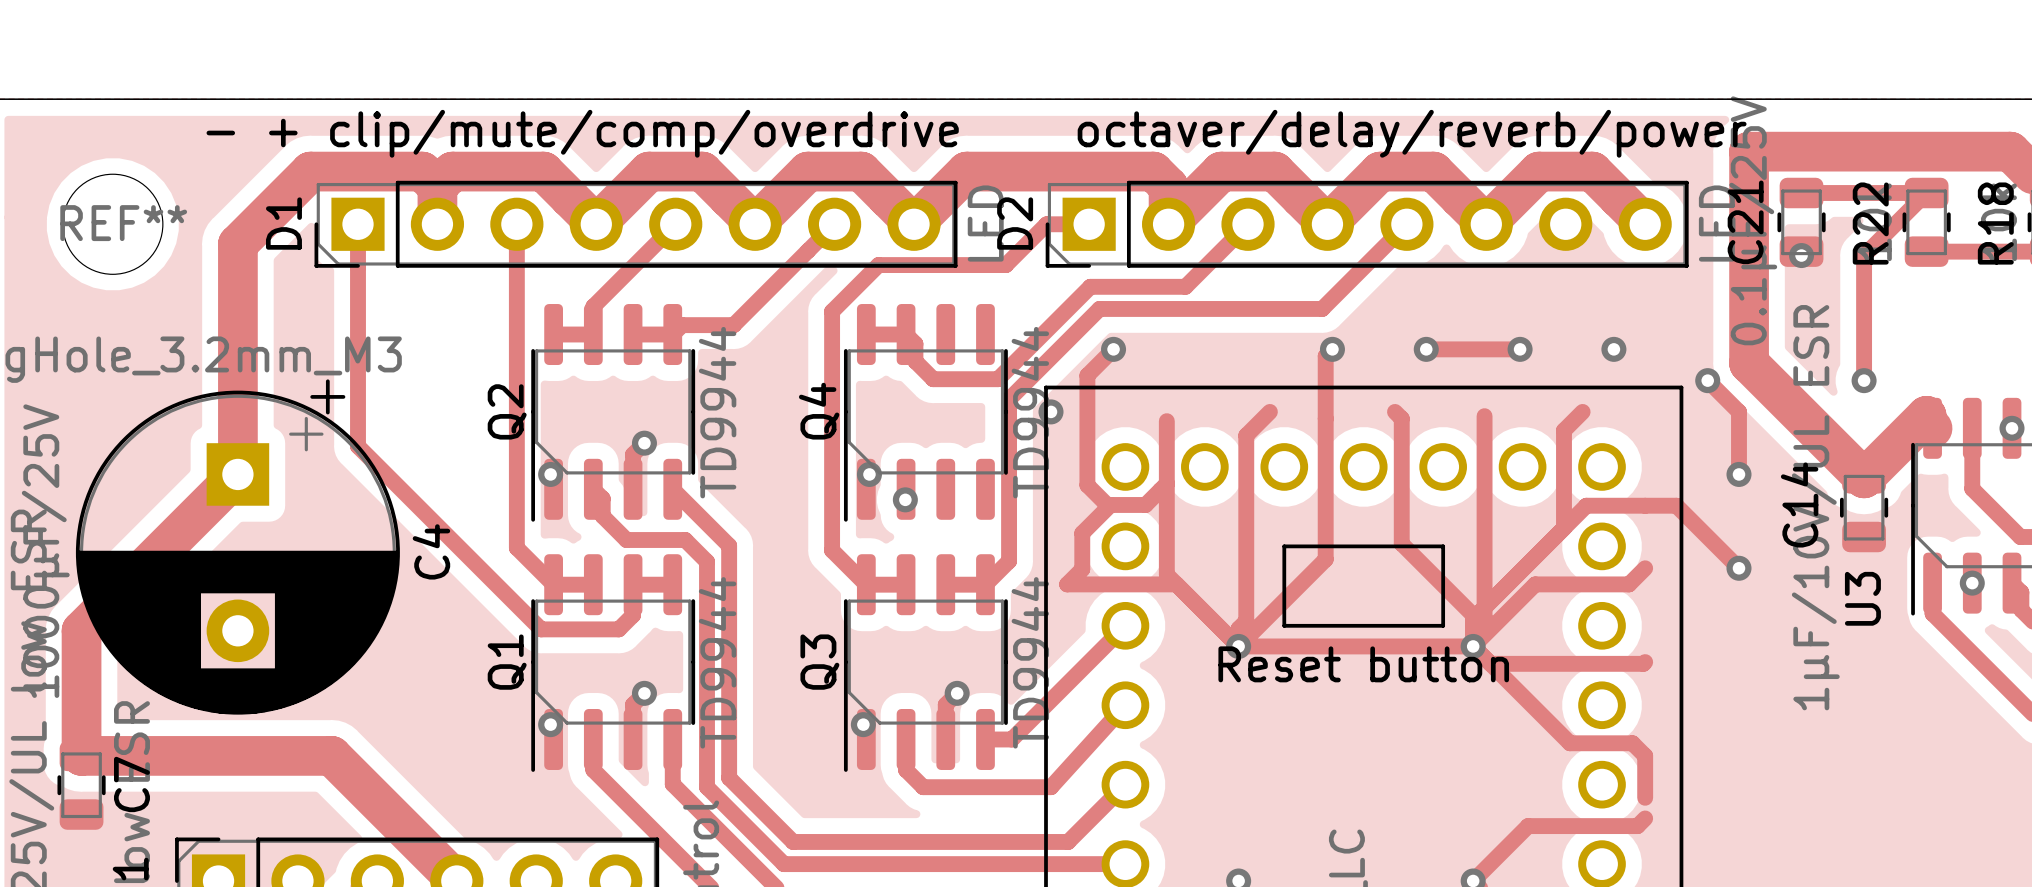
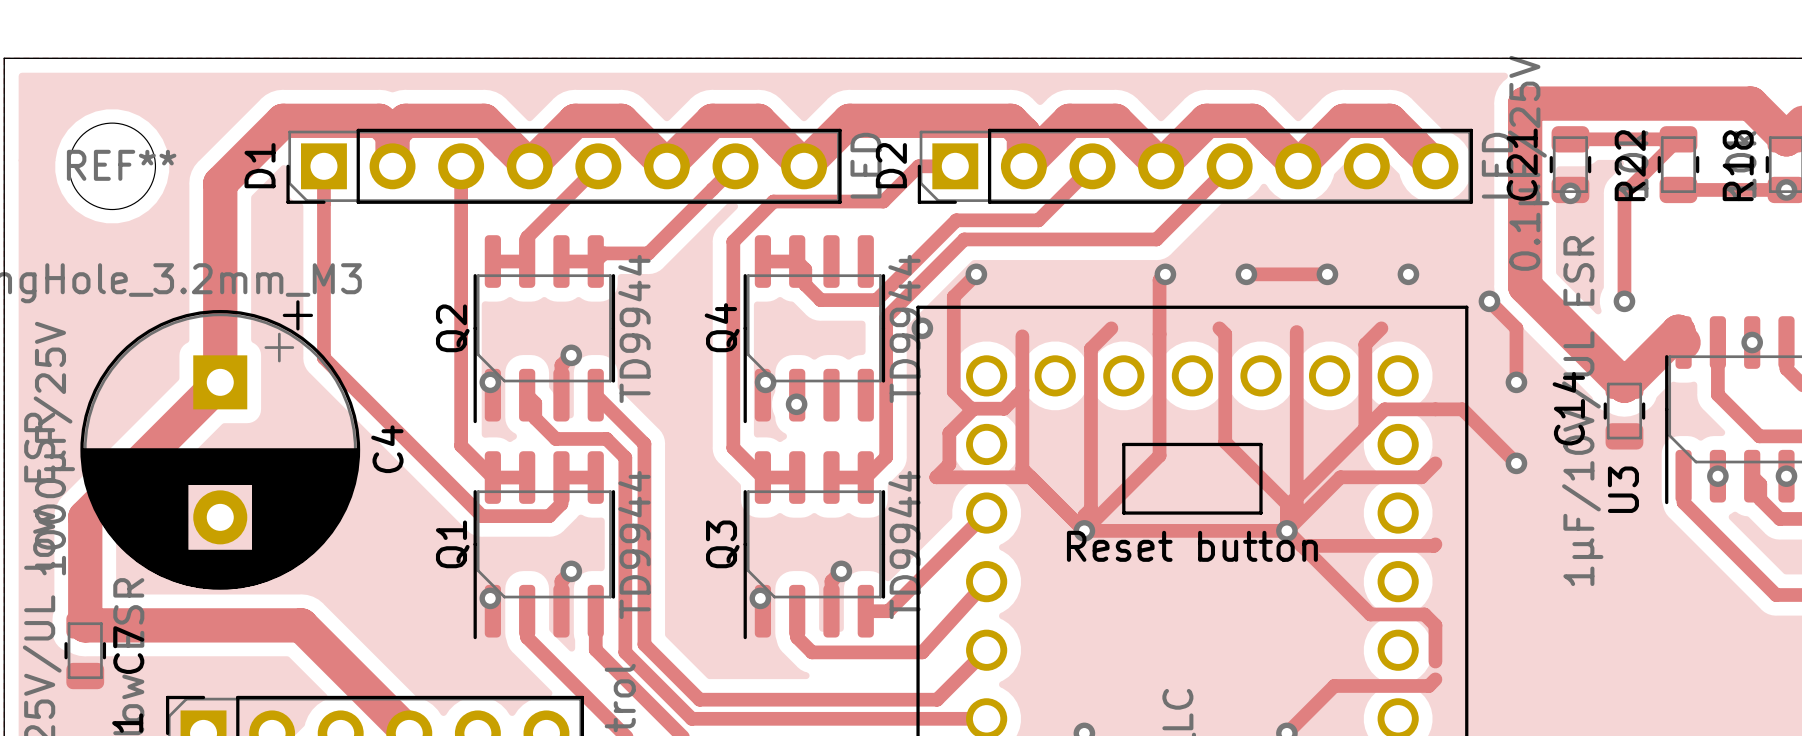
text: - + clip/mute/comp/overdrive (582, 133) -> none
text: octaver/delay/reverb/power (1412, 133) -> none

